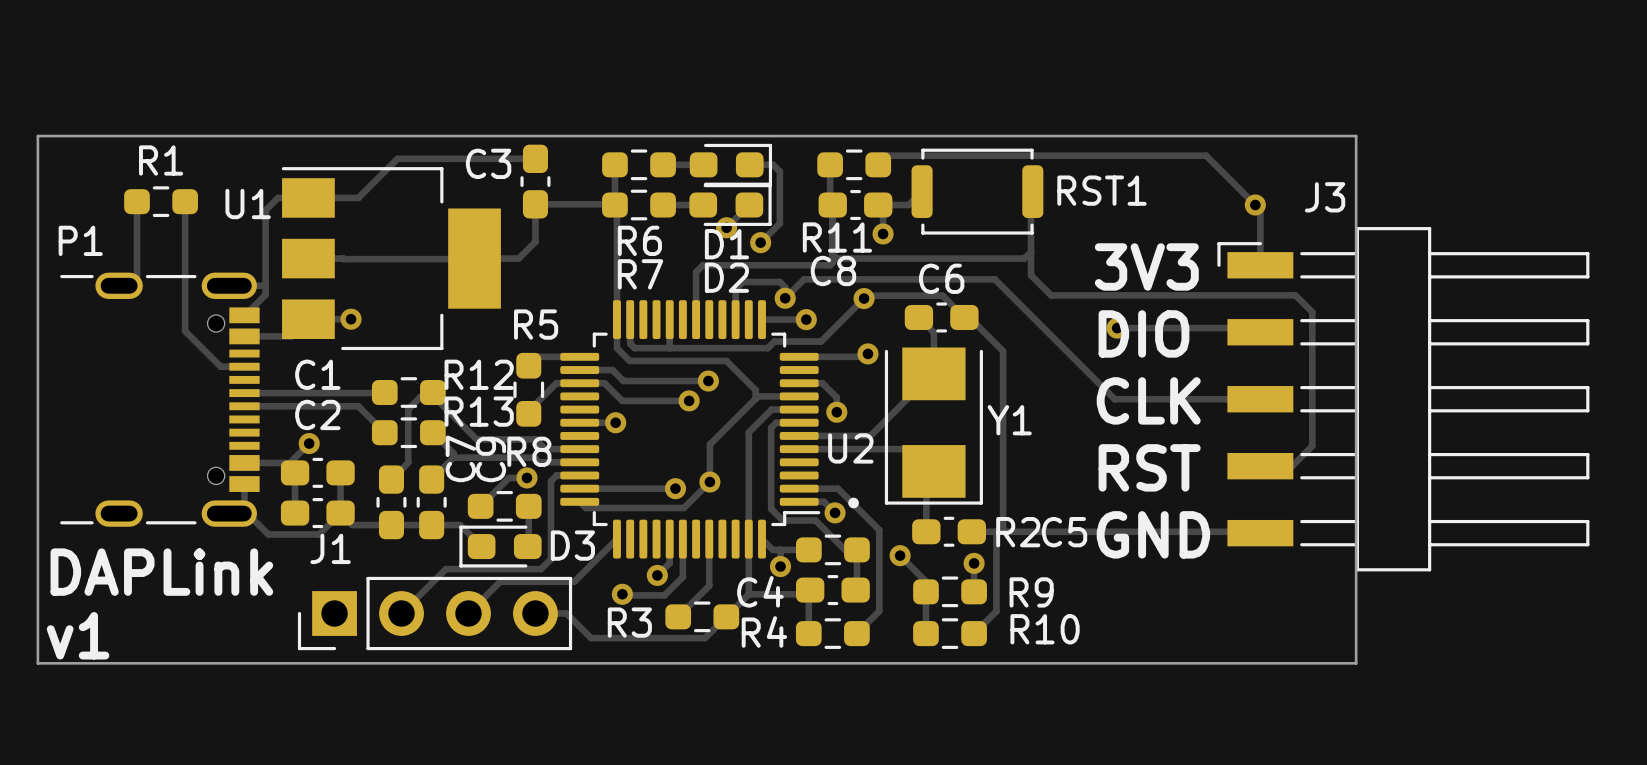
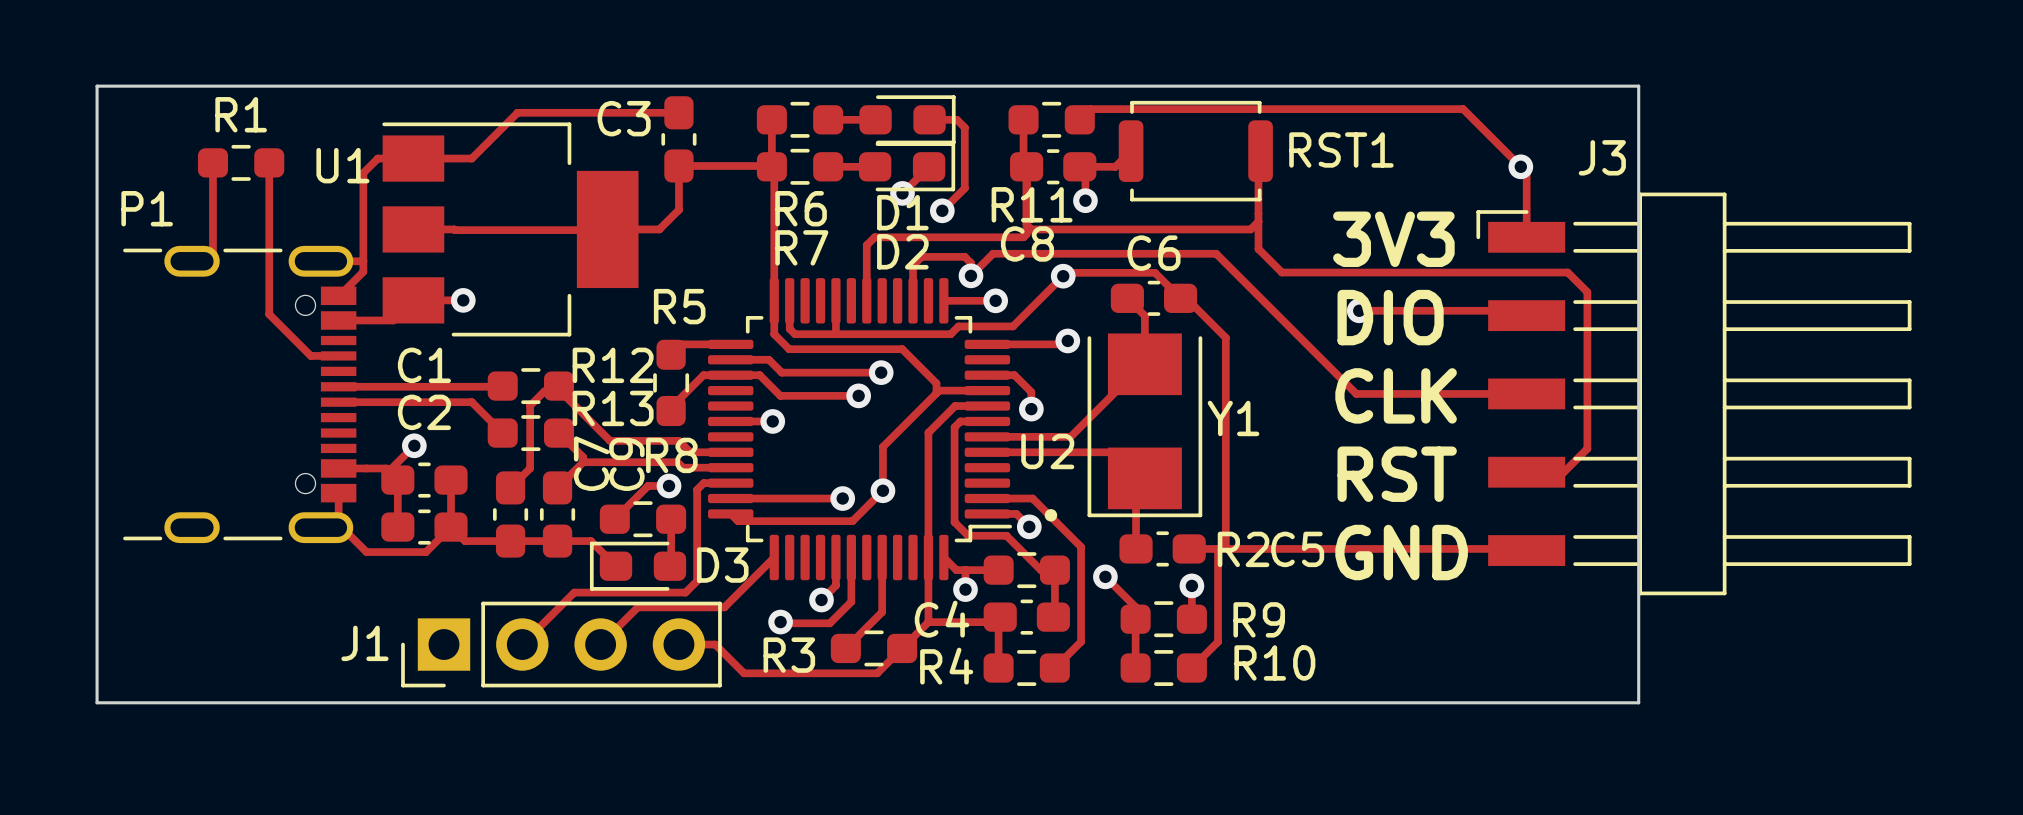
J1 name position: J1 (330, 548) -> J1 (364, 643)
text: DAPLink (161, 572) -> none
text: v1 (78, 635) -> none

